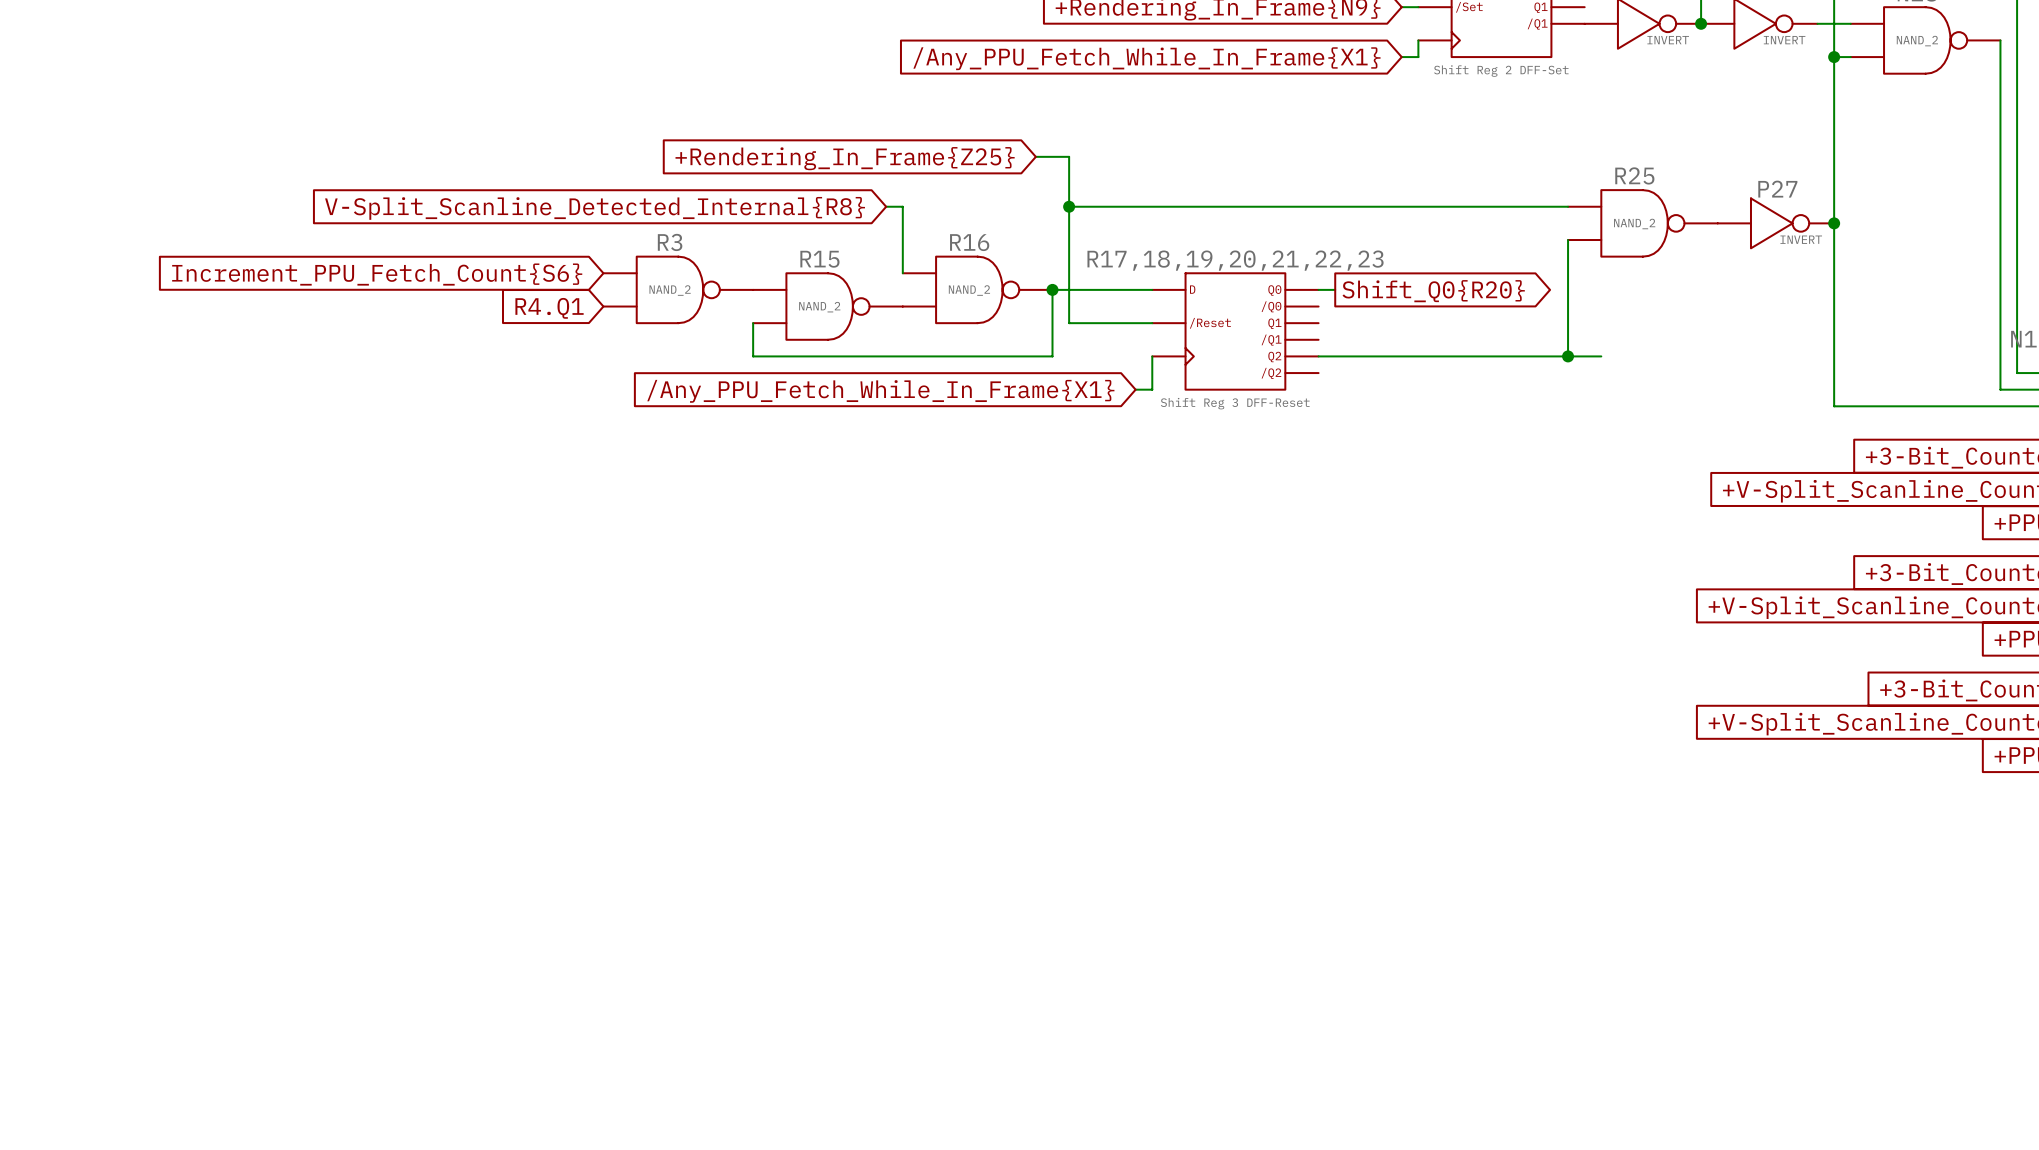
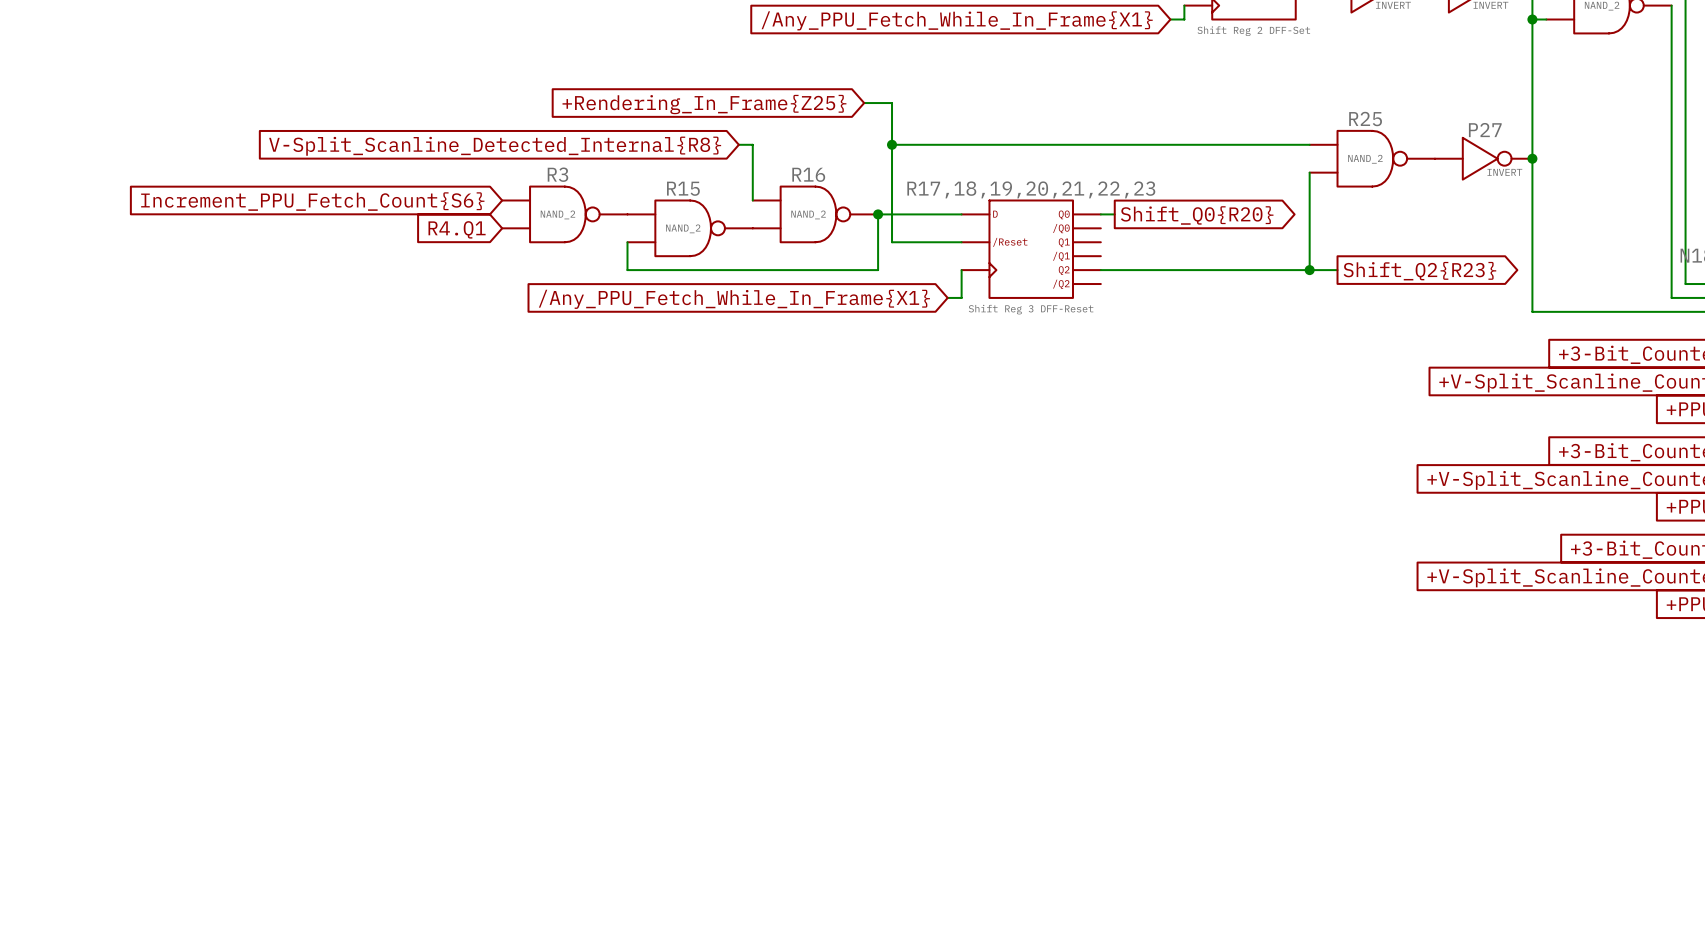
global label: none -> Shift_Q2{R23} (1419, 271)

